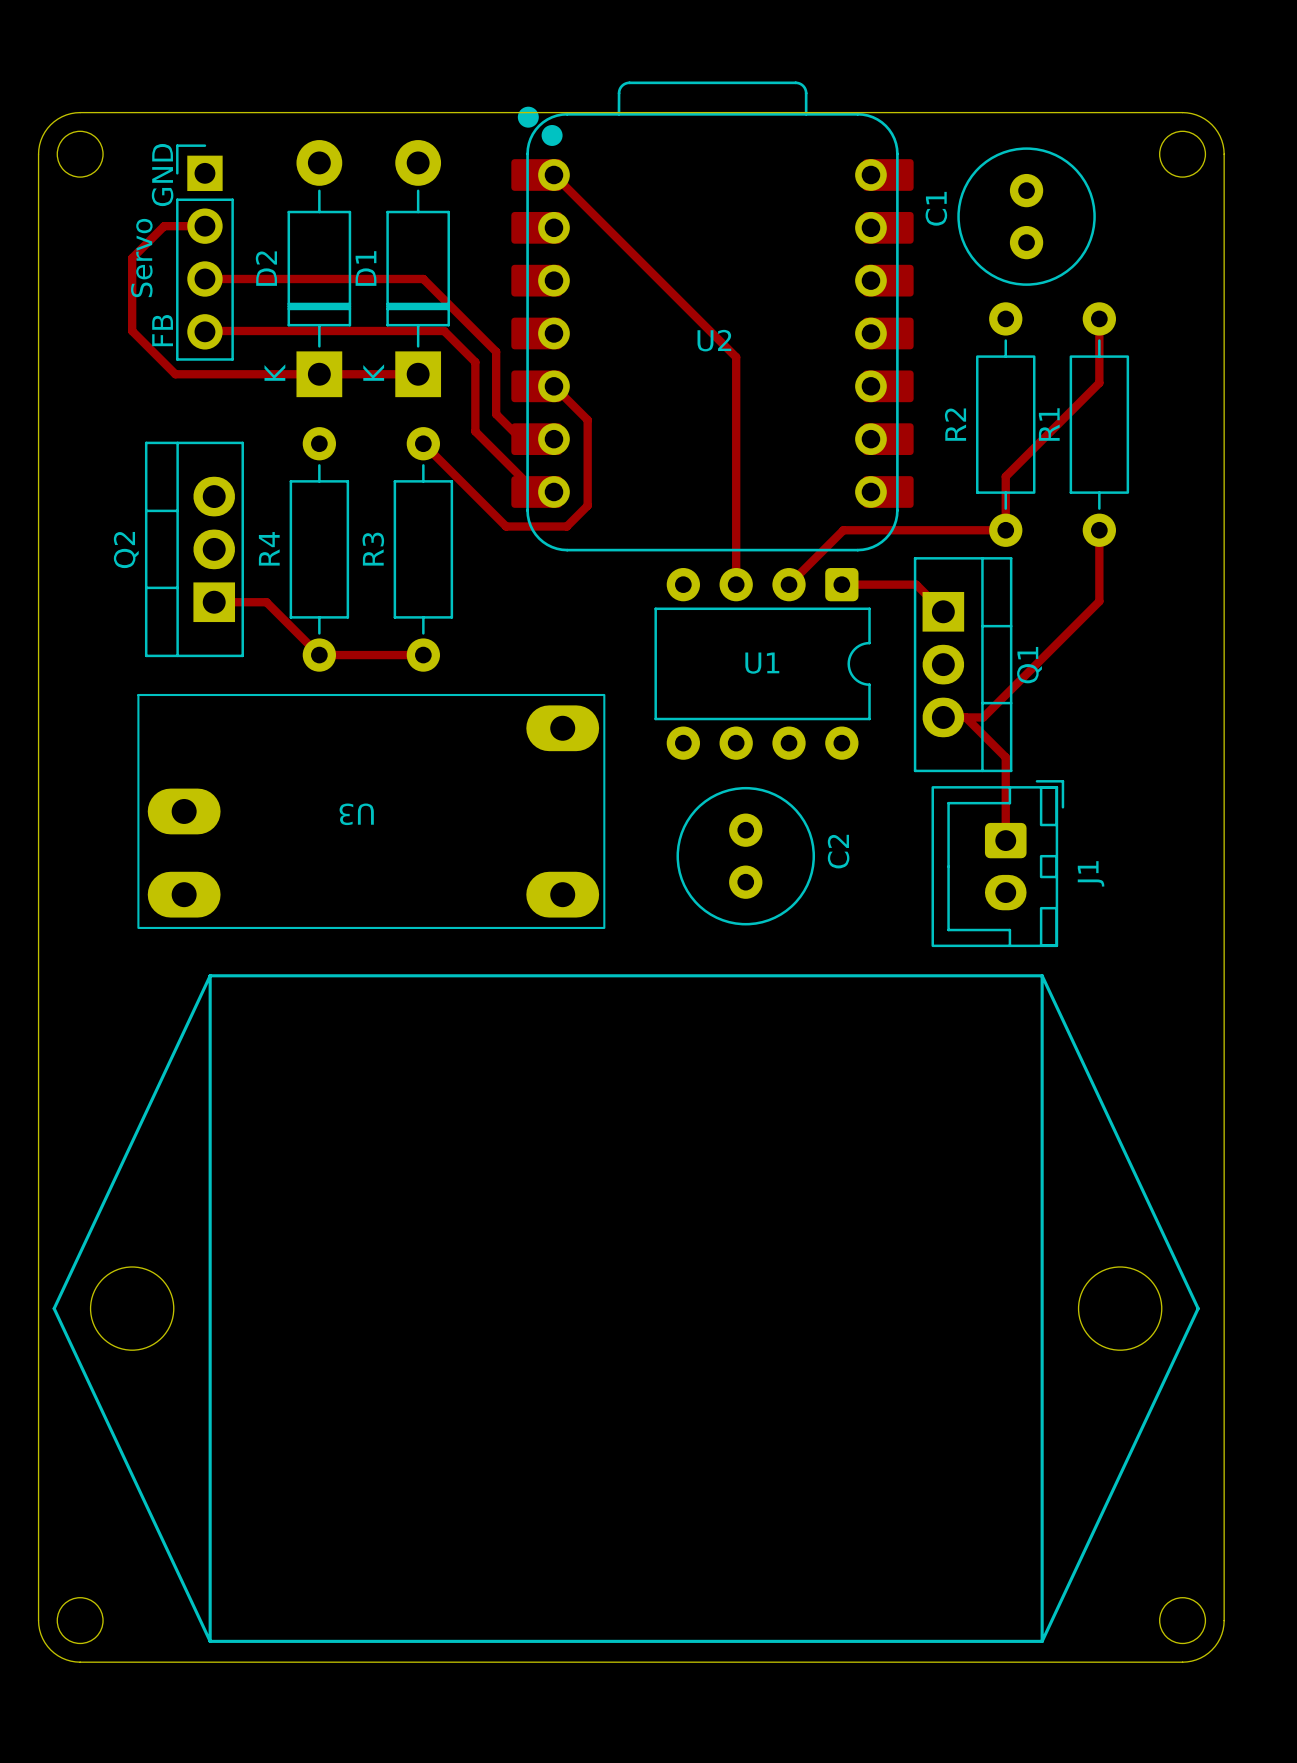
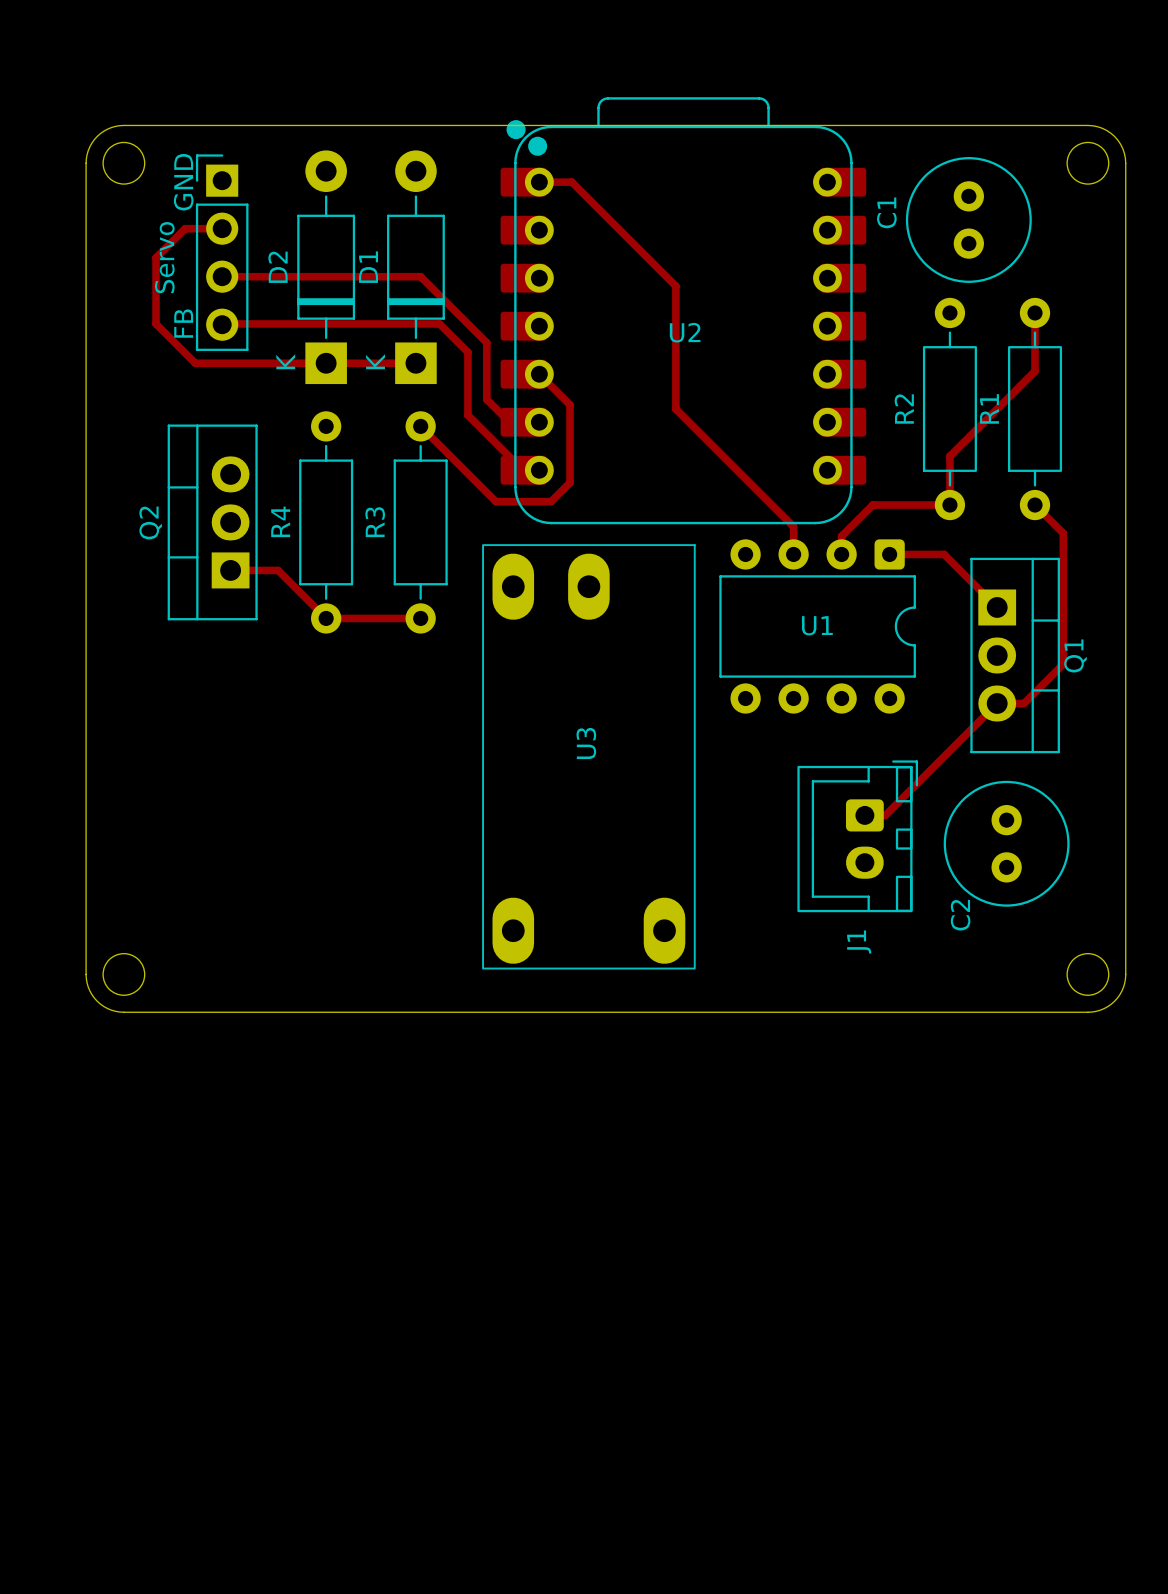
board edge: (96, 112) (70, 113) (54, 121) (42, 136) (38, 154) (38, 1620) (40, 1634) (44, 1642) (58, 1655) (70, 1661) (80, 1662) (1182, 1662) (1200, 1658) (1211, 1650) (1221, 1634) (1224, 1620) (1224, 154) (1220, 136) (1211, 124) (1204, 118) (1187, 112) (1157, 112) -> (123, 125) (111, 127) (97, 136) (88, 150) (86, 163) (86, 974) (89, 990) (97, 1001) (111, 1010) (123, 1012) (1087, 1012) (1100, 1010) (1114, 1001) (1121, 990) (1125, 974) (1125, 163) (1122, 148) (1114, 136) (1102, 128) (1087, 125)
round board edge position: (80, 154) -> (123, 163)
round board edge position: (1182, 154) -> (1087, 163)
track: (553, 175) (736, 357) (736, 584) -> (539, 182) (571, 182) (675, 286) (675, 409) (793, 526) (793, 554)
track: (920, 530) (843, 530) (789, 584) -> (872, 505) (841, 536) (841, 554)
track: (1099, 530) (1099, 601) (983, 717) (943, 717) -> (1035, 505) (1063, 533) (1063, 664) (1024, 703) (995, 703)
track: (841, 584) (916, 584) (943, 611) -> none
track: none -> (889, 554) (944, 554) (997, 607)
U1 position: (762, 663) -> (817, 626)
Q1 position: (963, 664) -> (1015, 655)
track: (965, 717) (1005, 757) (1005, 840) -> none
track: none -> (997, 703) (885, 815) (864, 815)
U3 rotation: 0° (371, 811) -> 90° clockwise (588, 756)
C2 name position: C2 (838, 851) -> C2 (960, 915)
C2 position: (745, 856) -> (1006, 843)
J1 position: (997, 863) -> (857, 836)
J1 name position: J1 (1091, 873) -> J1 (859, 942)
line: (210, 975) (1042, 975) -> none
line: (210, 975) (210, 1641) -> none
line: (210, 975) (54, 1308) (210, 1641) -> none
line: (1042, 975) (1042, 1641) -> none
line: (1042, 975) (1198, 1308) (1042, 1641) -> none
round board edge: none -> [102, 953, 146, 996]
round board edge: none -> [1066, 953, 1110, 996]
round board edge: [90, 1266, 175, 1351] -> none
round board edge: [1078, 1266, 1163, 1351] -> none
round board edge: [56, 1597, 104, 1644] -> none
round board edge: [1159, 1597, 1206, 1644] -> none
line: (210, 1641) (1042, 1641) -> none

